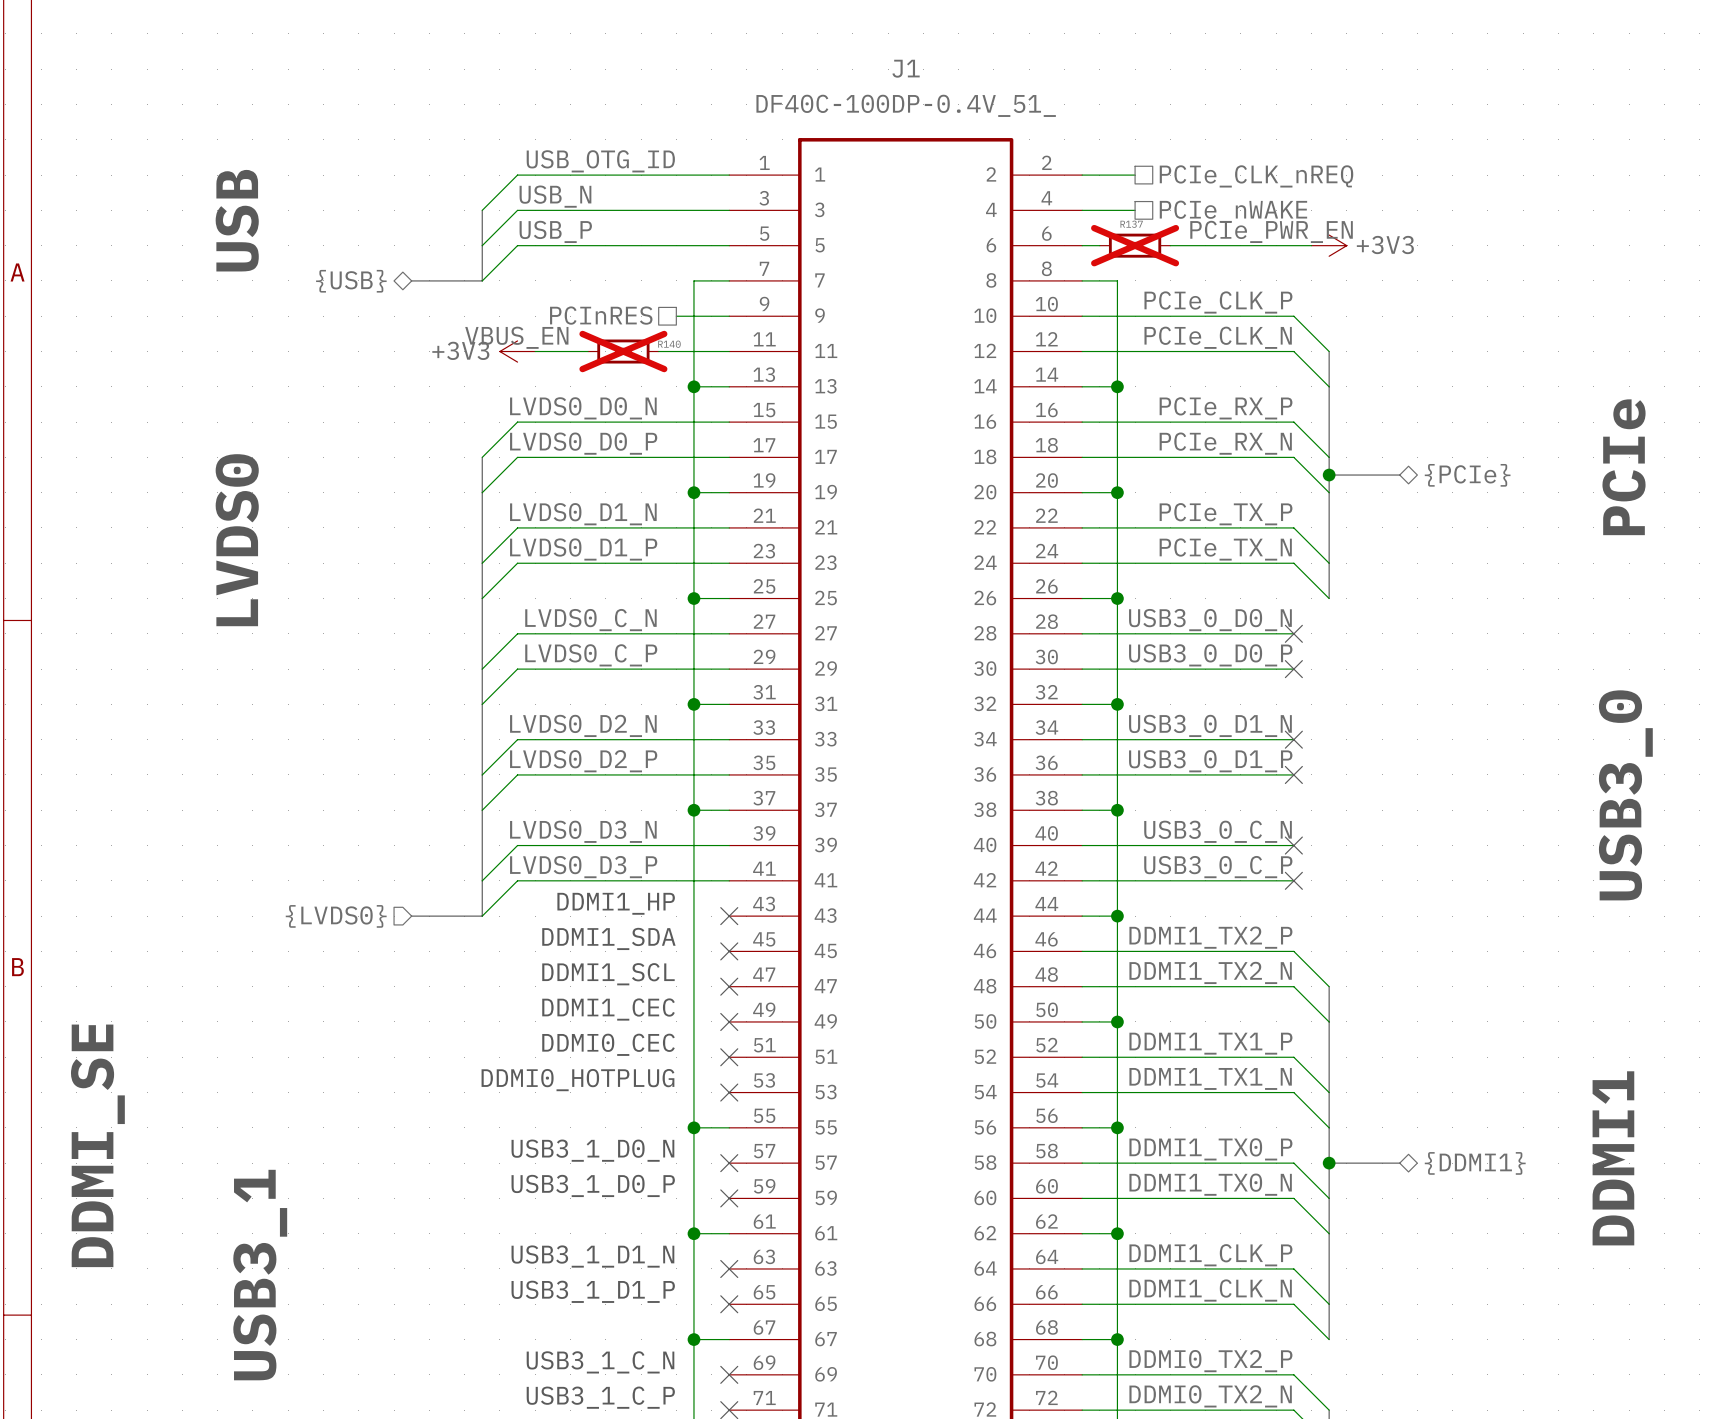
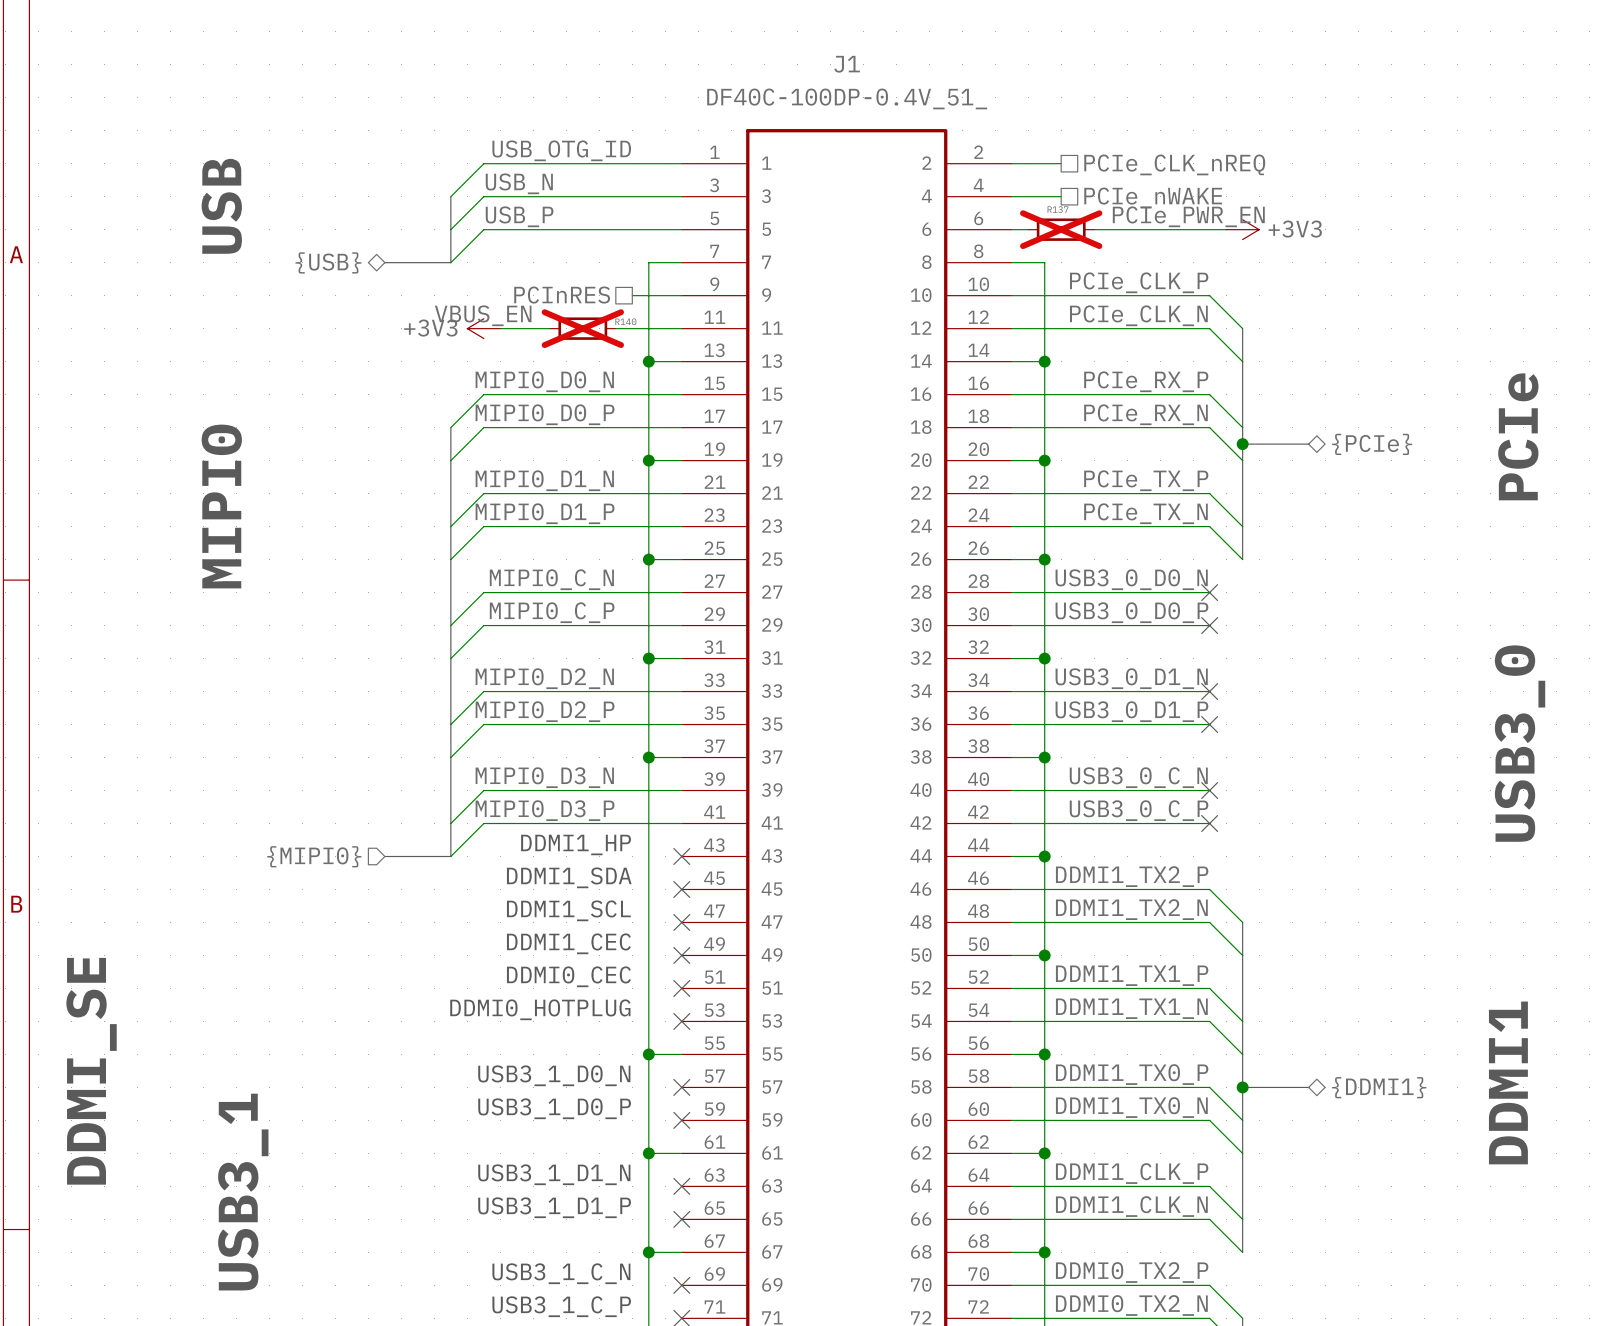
label: LVDS0_D0_N (583, 408) -> MIPI0_D0_N (544, 381)
label: LVDS0_D0_P (583, 443) -> MIPI0_D0_P (545, 414)
label: LVDS0_D1_N (583, 514) -> MIPI0_D1_N (544, 480)
text: LVDS0 (237, 540) -> MIPI0 (221, 506)
label: LVDS0_D1_P (583, 549) -> MIPI0_D1_P (545, 513)
label: LVDS0_C_N (590, 620) -> MIPI0_C_N (551, 579)
label: LVDS0_C_P (591, 655) -> MIPI0_C_P (552, 612)
label: LVDS0_D2_N (583, 725) -> MIPI0_D2_N (544, 678)
label: LVDS0_D2_P (583, 761) -> MIPI0_D2_P (545, 711)
label: LVDS0_D3_N (583, 831) -> MIPI0_D3_N (544, 777)
label: LVDS0_D3_P (583, 867) -> MIPI0_D3_P (545, 810)
hierarchical label: {LVDS0} (336, 916) -> {MIPI0} (314, 856)

